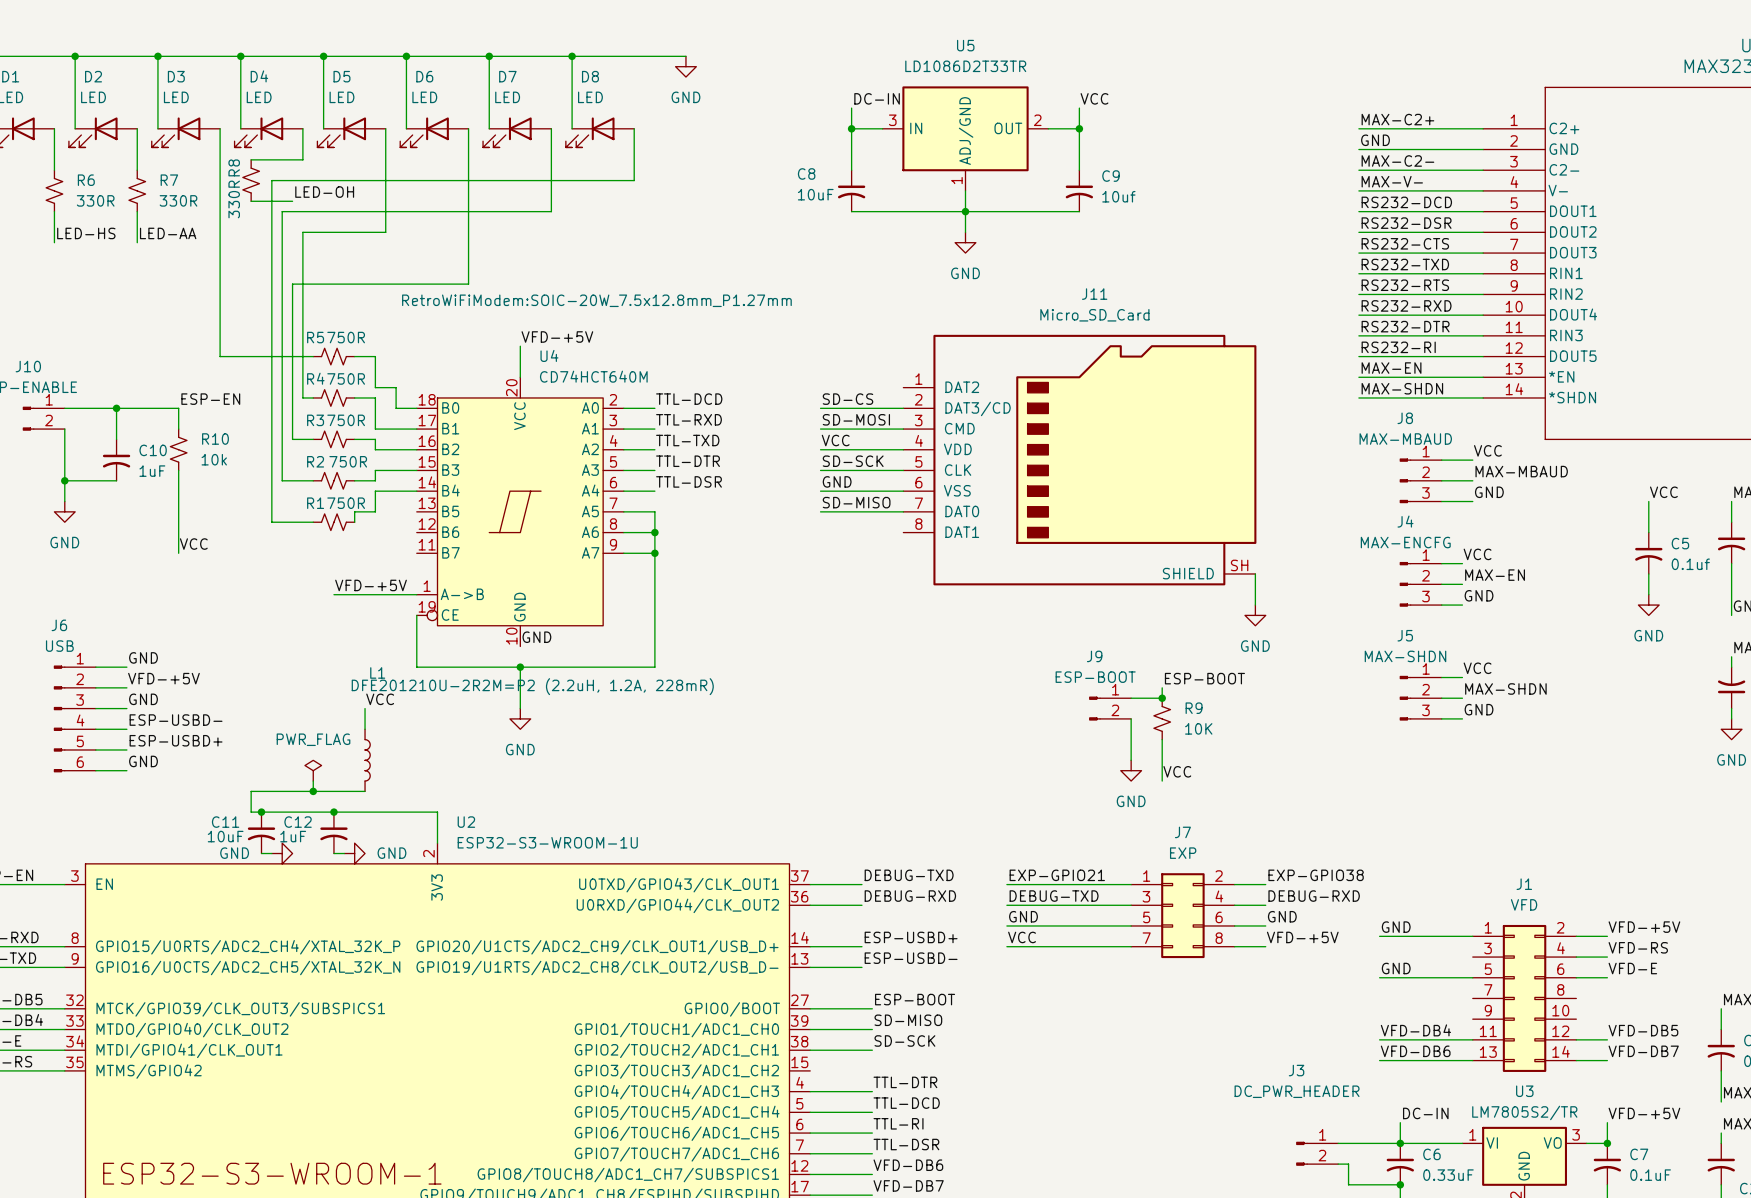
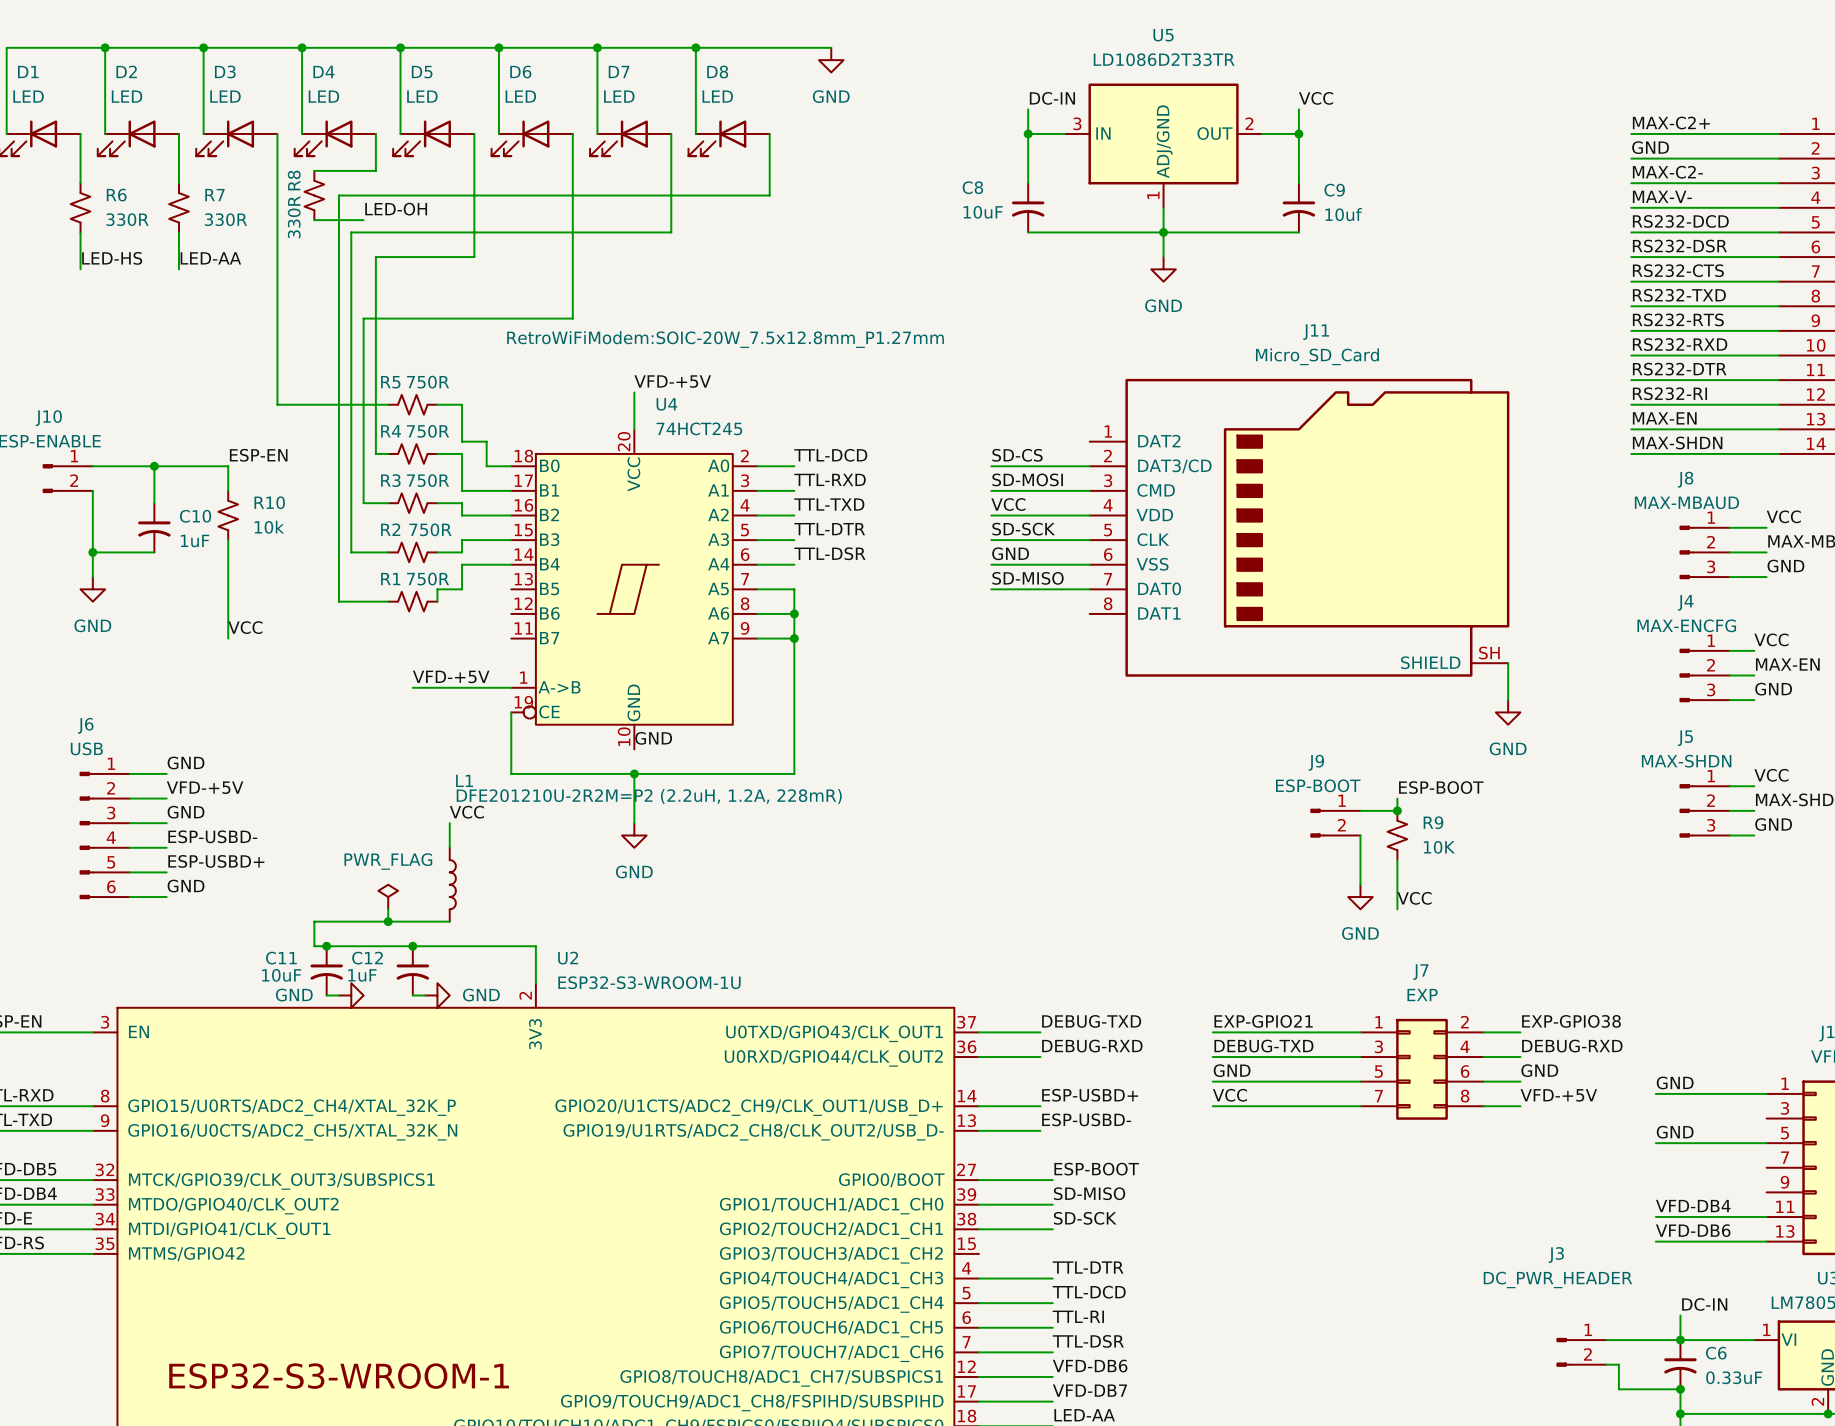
U4 value: CD74HCT640M (593, 376) -> 74HCT245 (699, 428)

